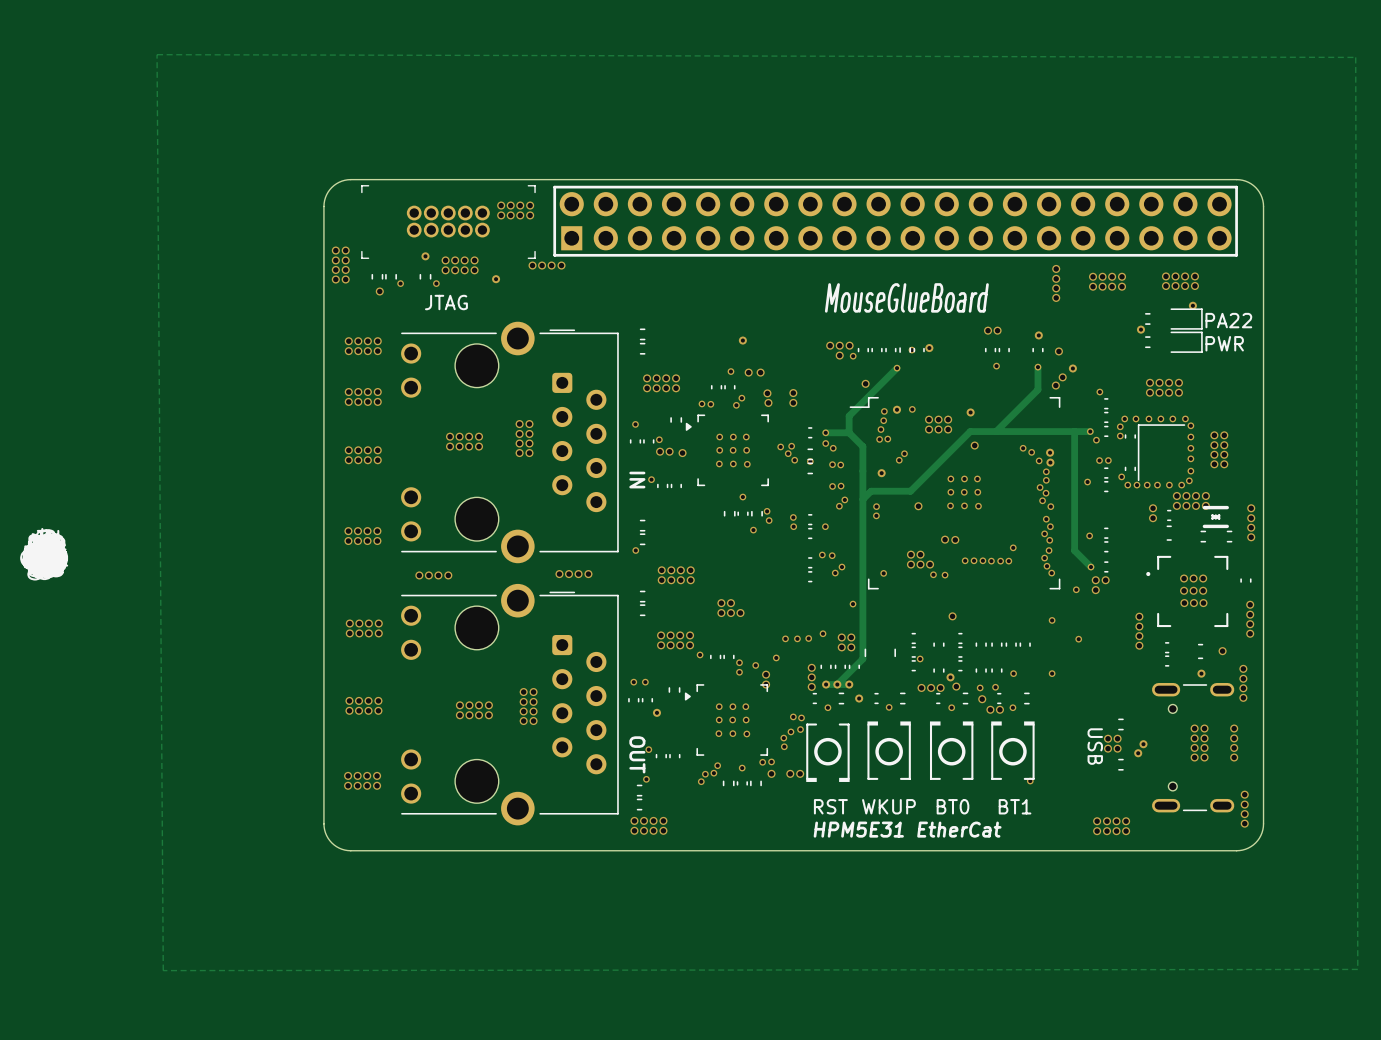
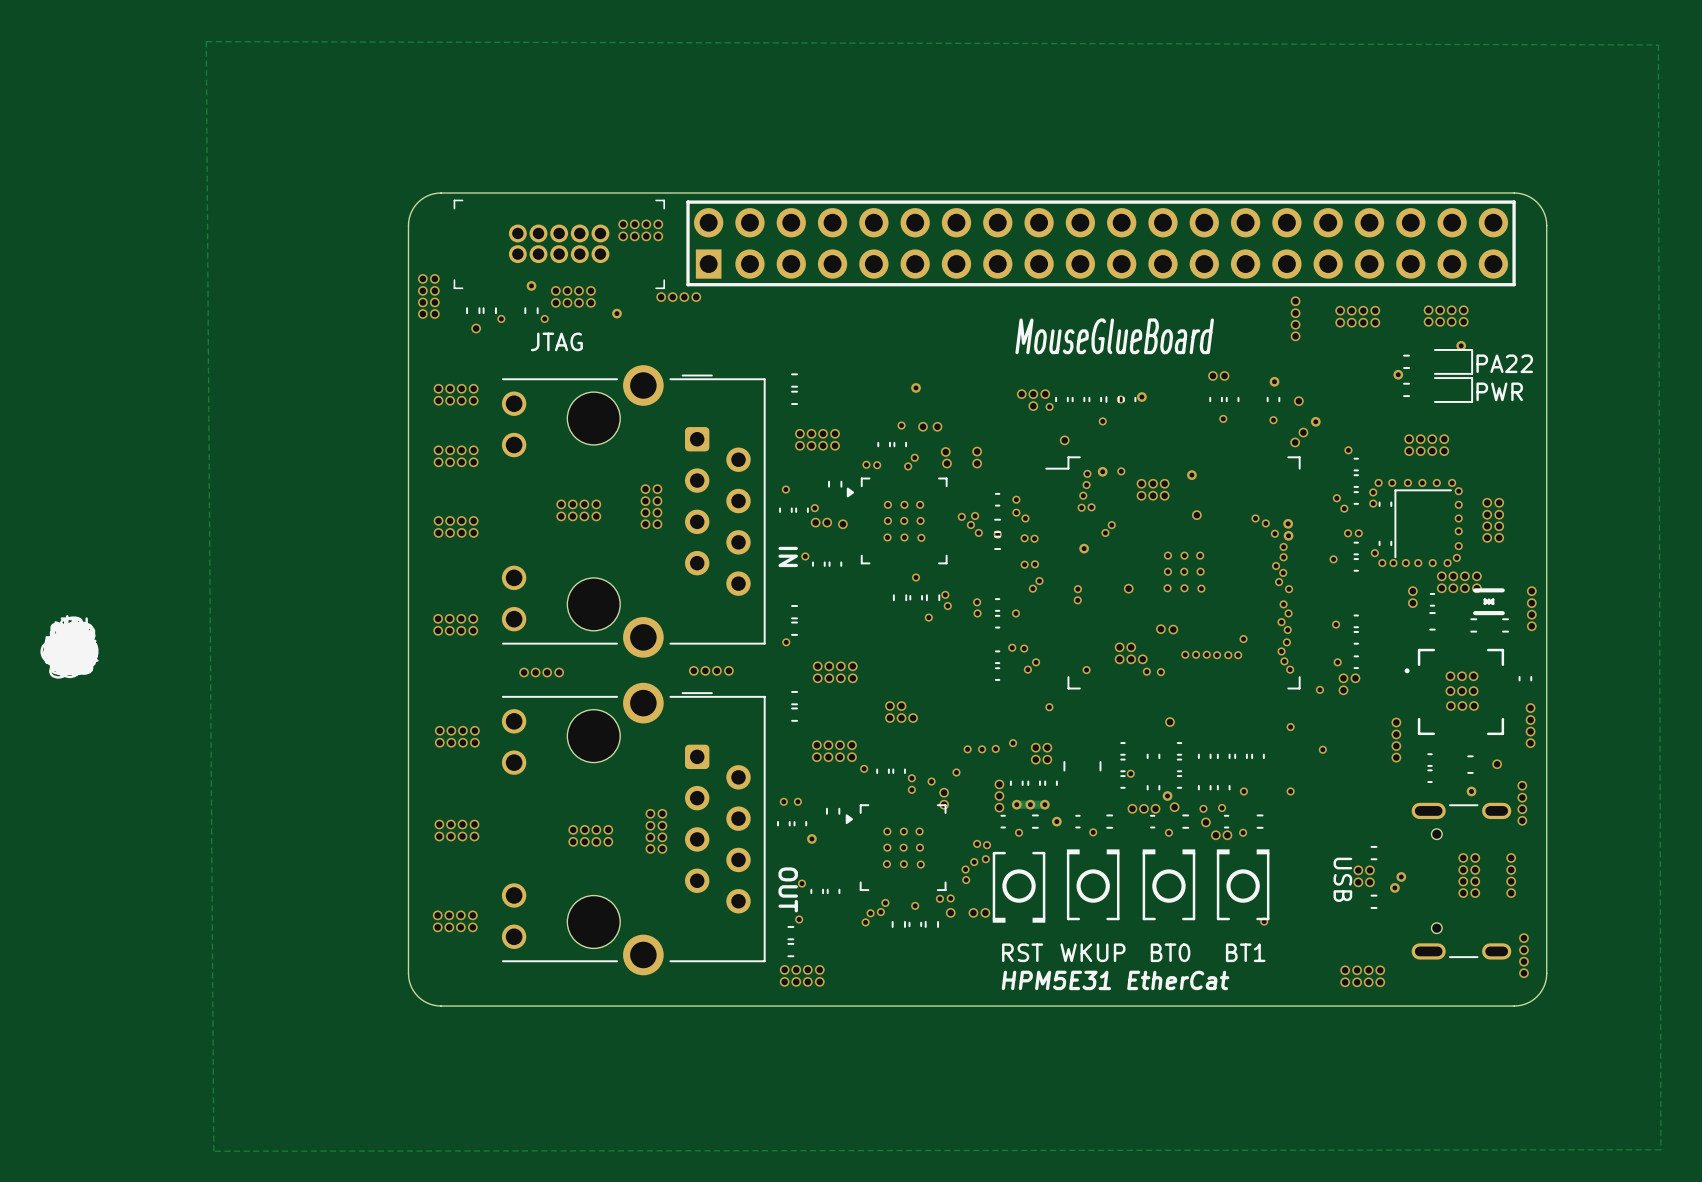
track: (1037, 367) (1037, 389) (996, 431) -> none
track: (897, 368) (849, 416) (849, 432) -> none
track: (1074, 431) (1074, 550) (1090, 567) -> none
track: (1090, 431) (970, 431) (910, 491) (871, 491) (862, 499) -> none
track: (825, 432) (849, 432) -> none
track: (849, 432) (862, 446) (862, 658) (837, 684) -> none

